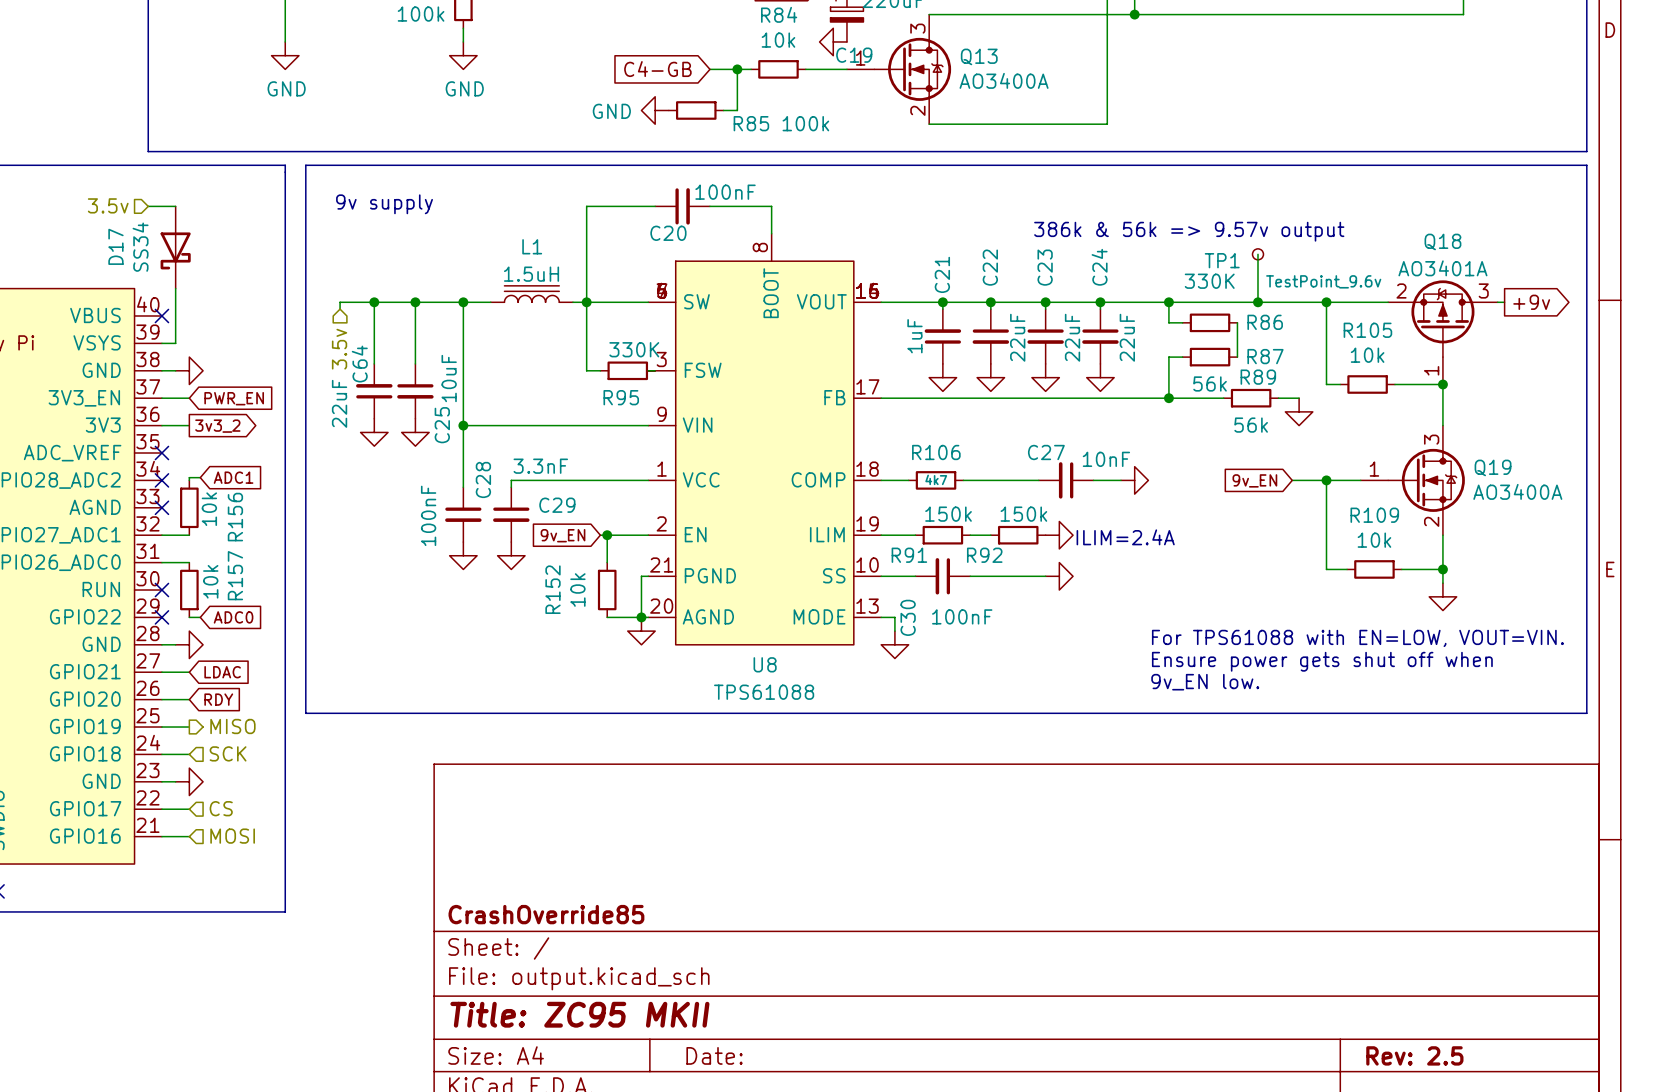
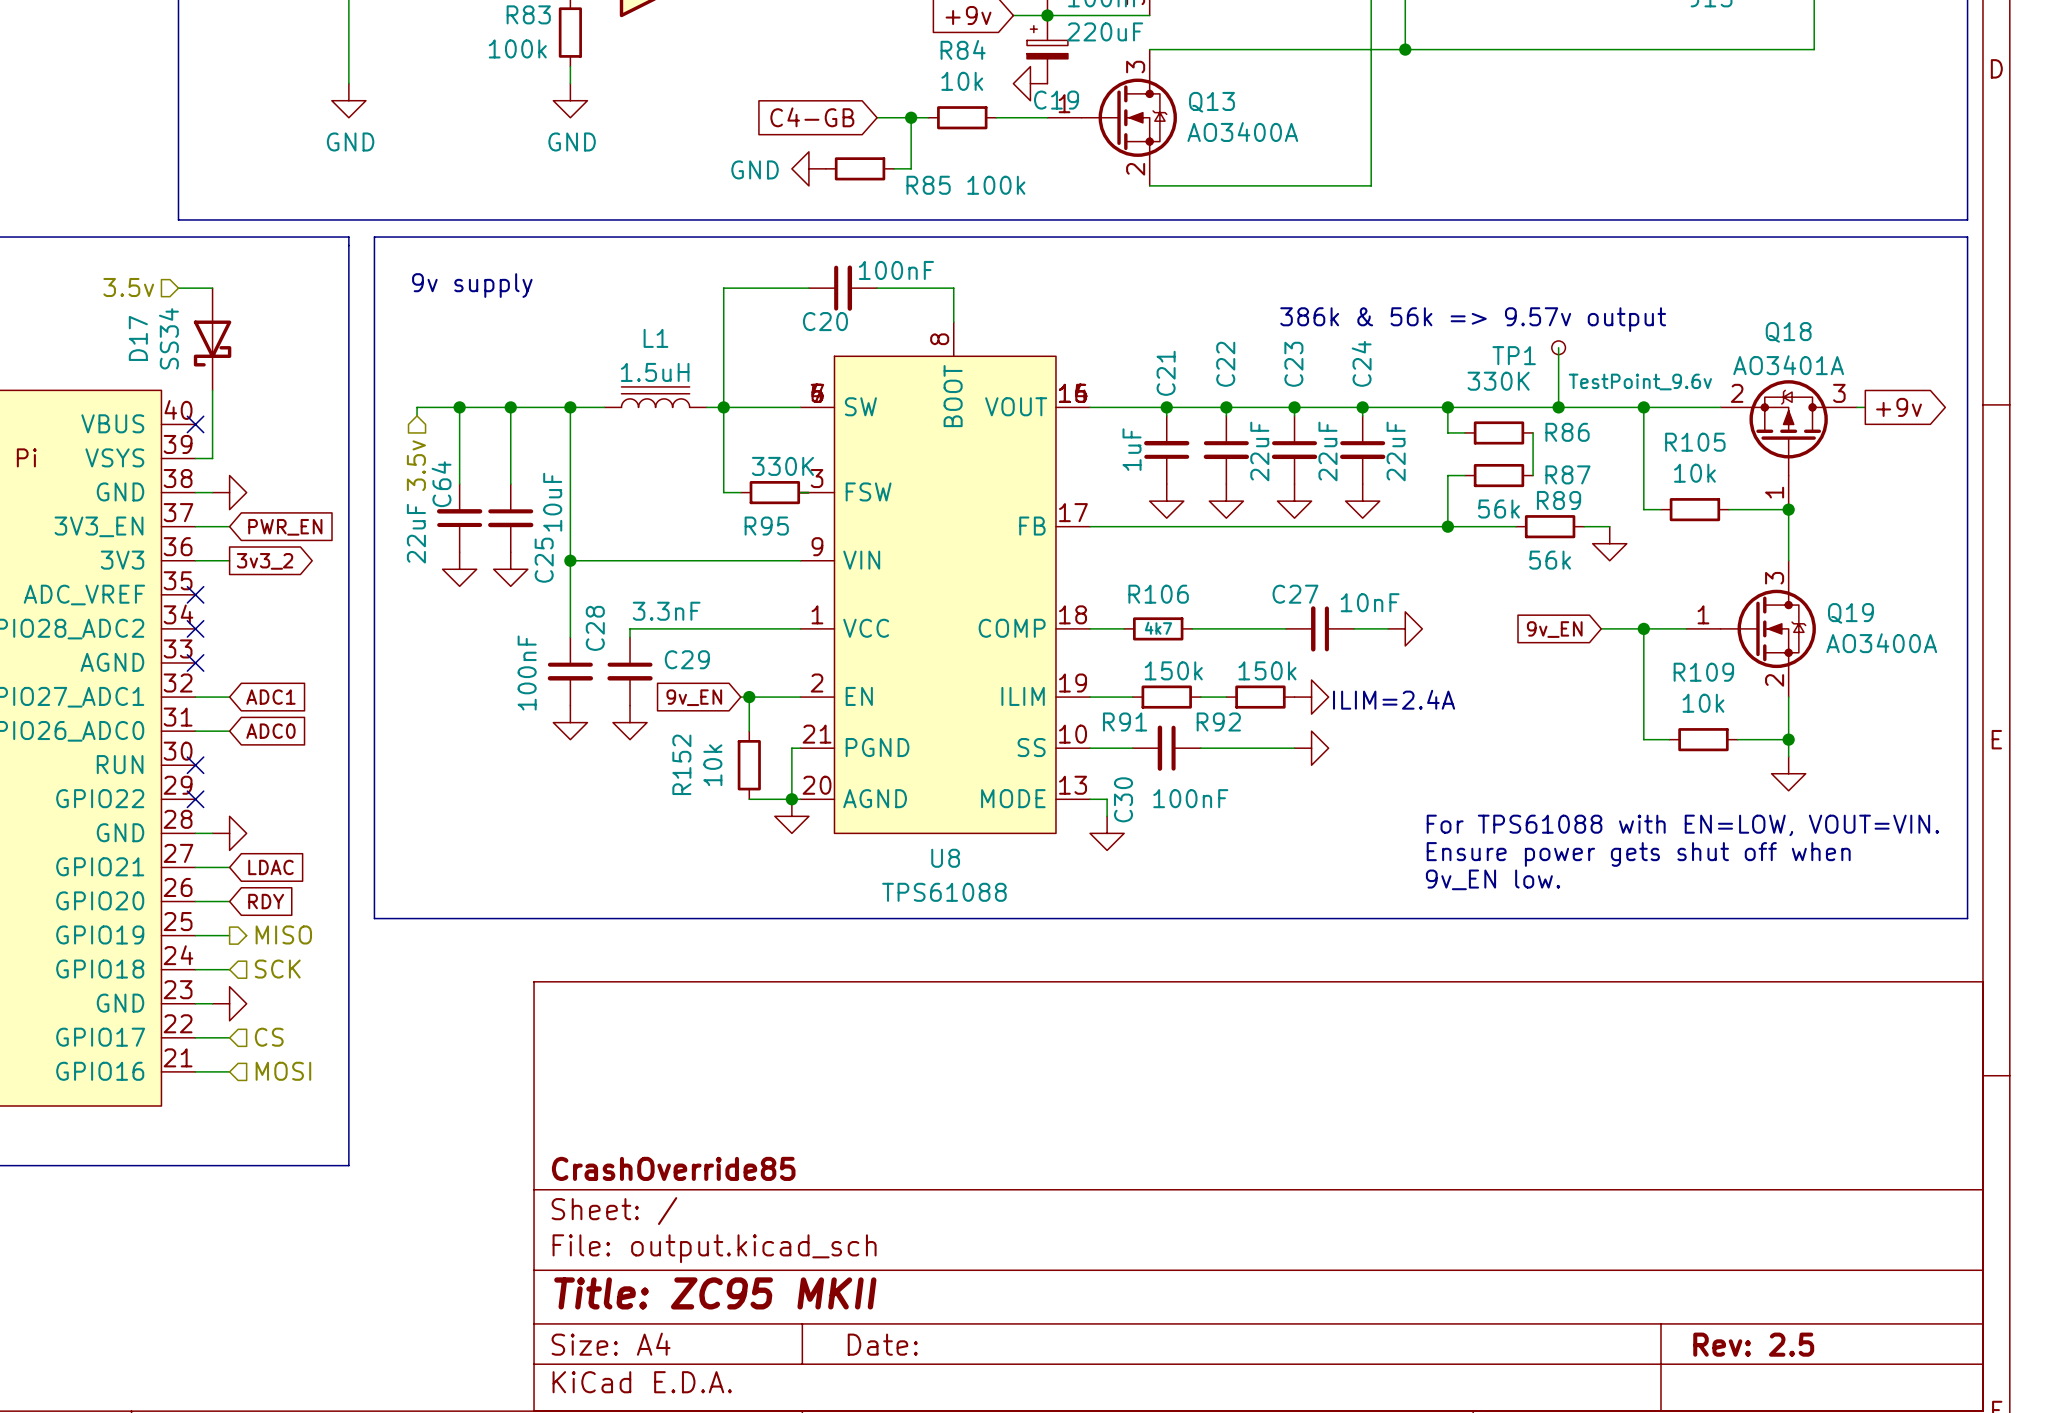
wire: (200, 477) (189, 477) (189, 480) -> none
global label position: ADC1 (233, 477) -> ADC1 (270, 697)
R156: 10k (189, 507) -> none
R157: 10k (189, 590) -> none
wire: (189, 617) (200, 617) -> none
global label position: ADC0 (233, 617) -> ADC0 (270, 731)

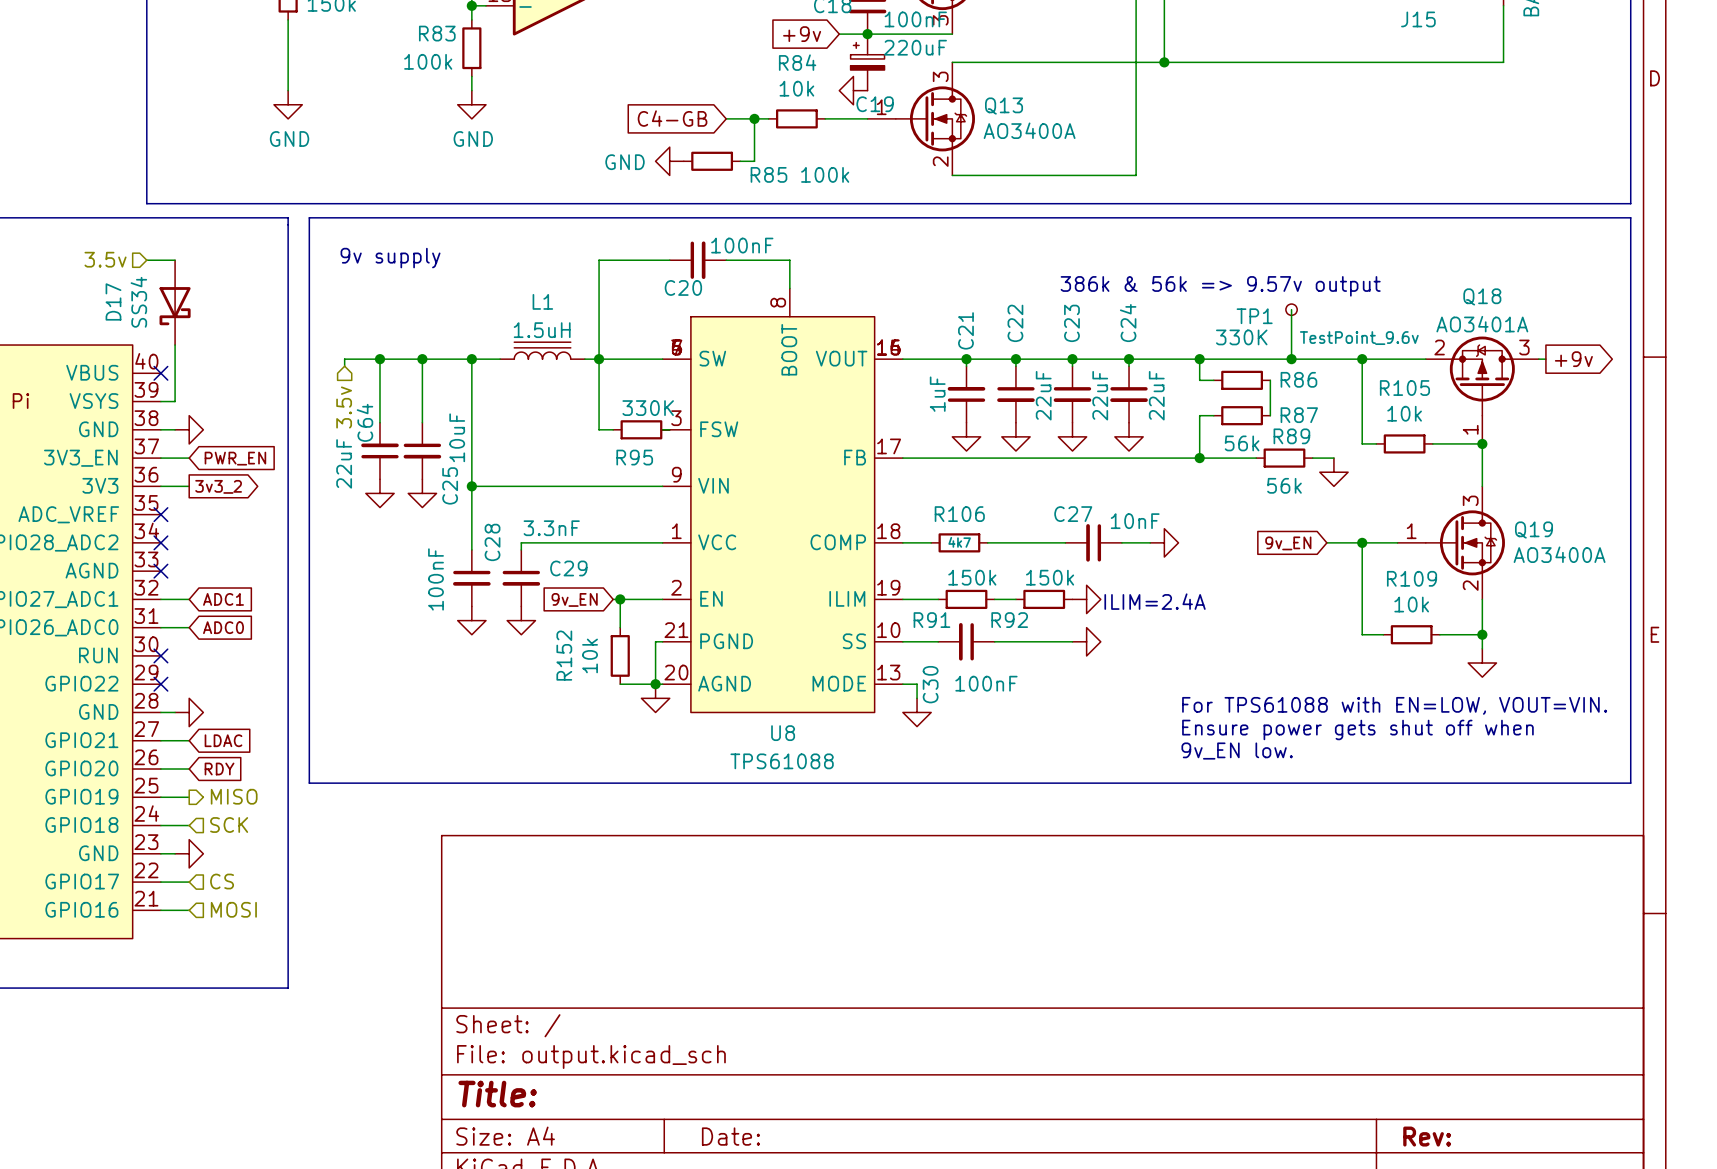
title block: CrashOverride85 (673, 1168) -> none
title block: Title: ZC95 MKII (715, 1293) -> Title: (497, 1094)
title block: Rev: 2.5 (1753, 1344) -> Rev: (1427, 1136)

